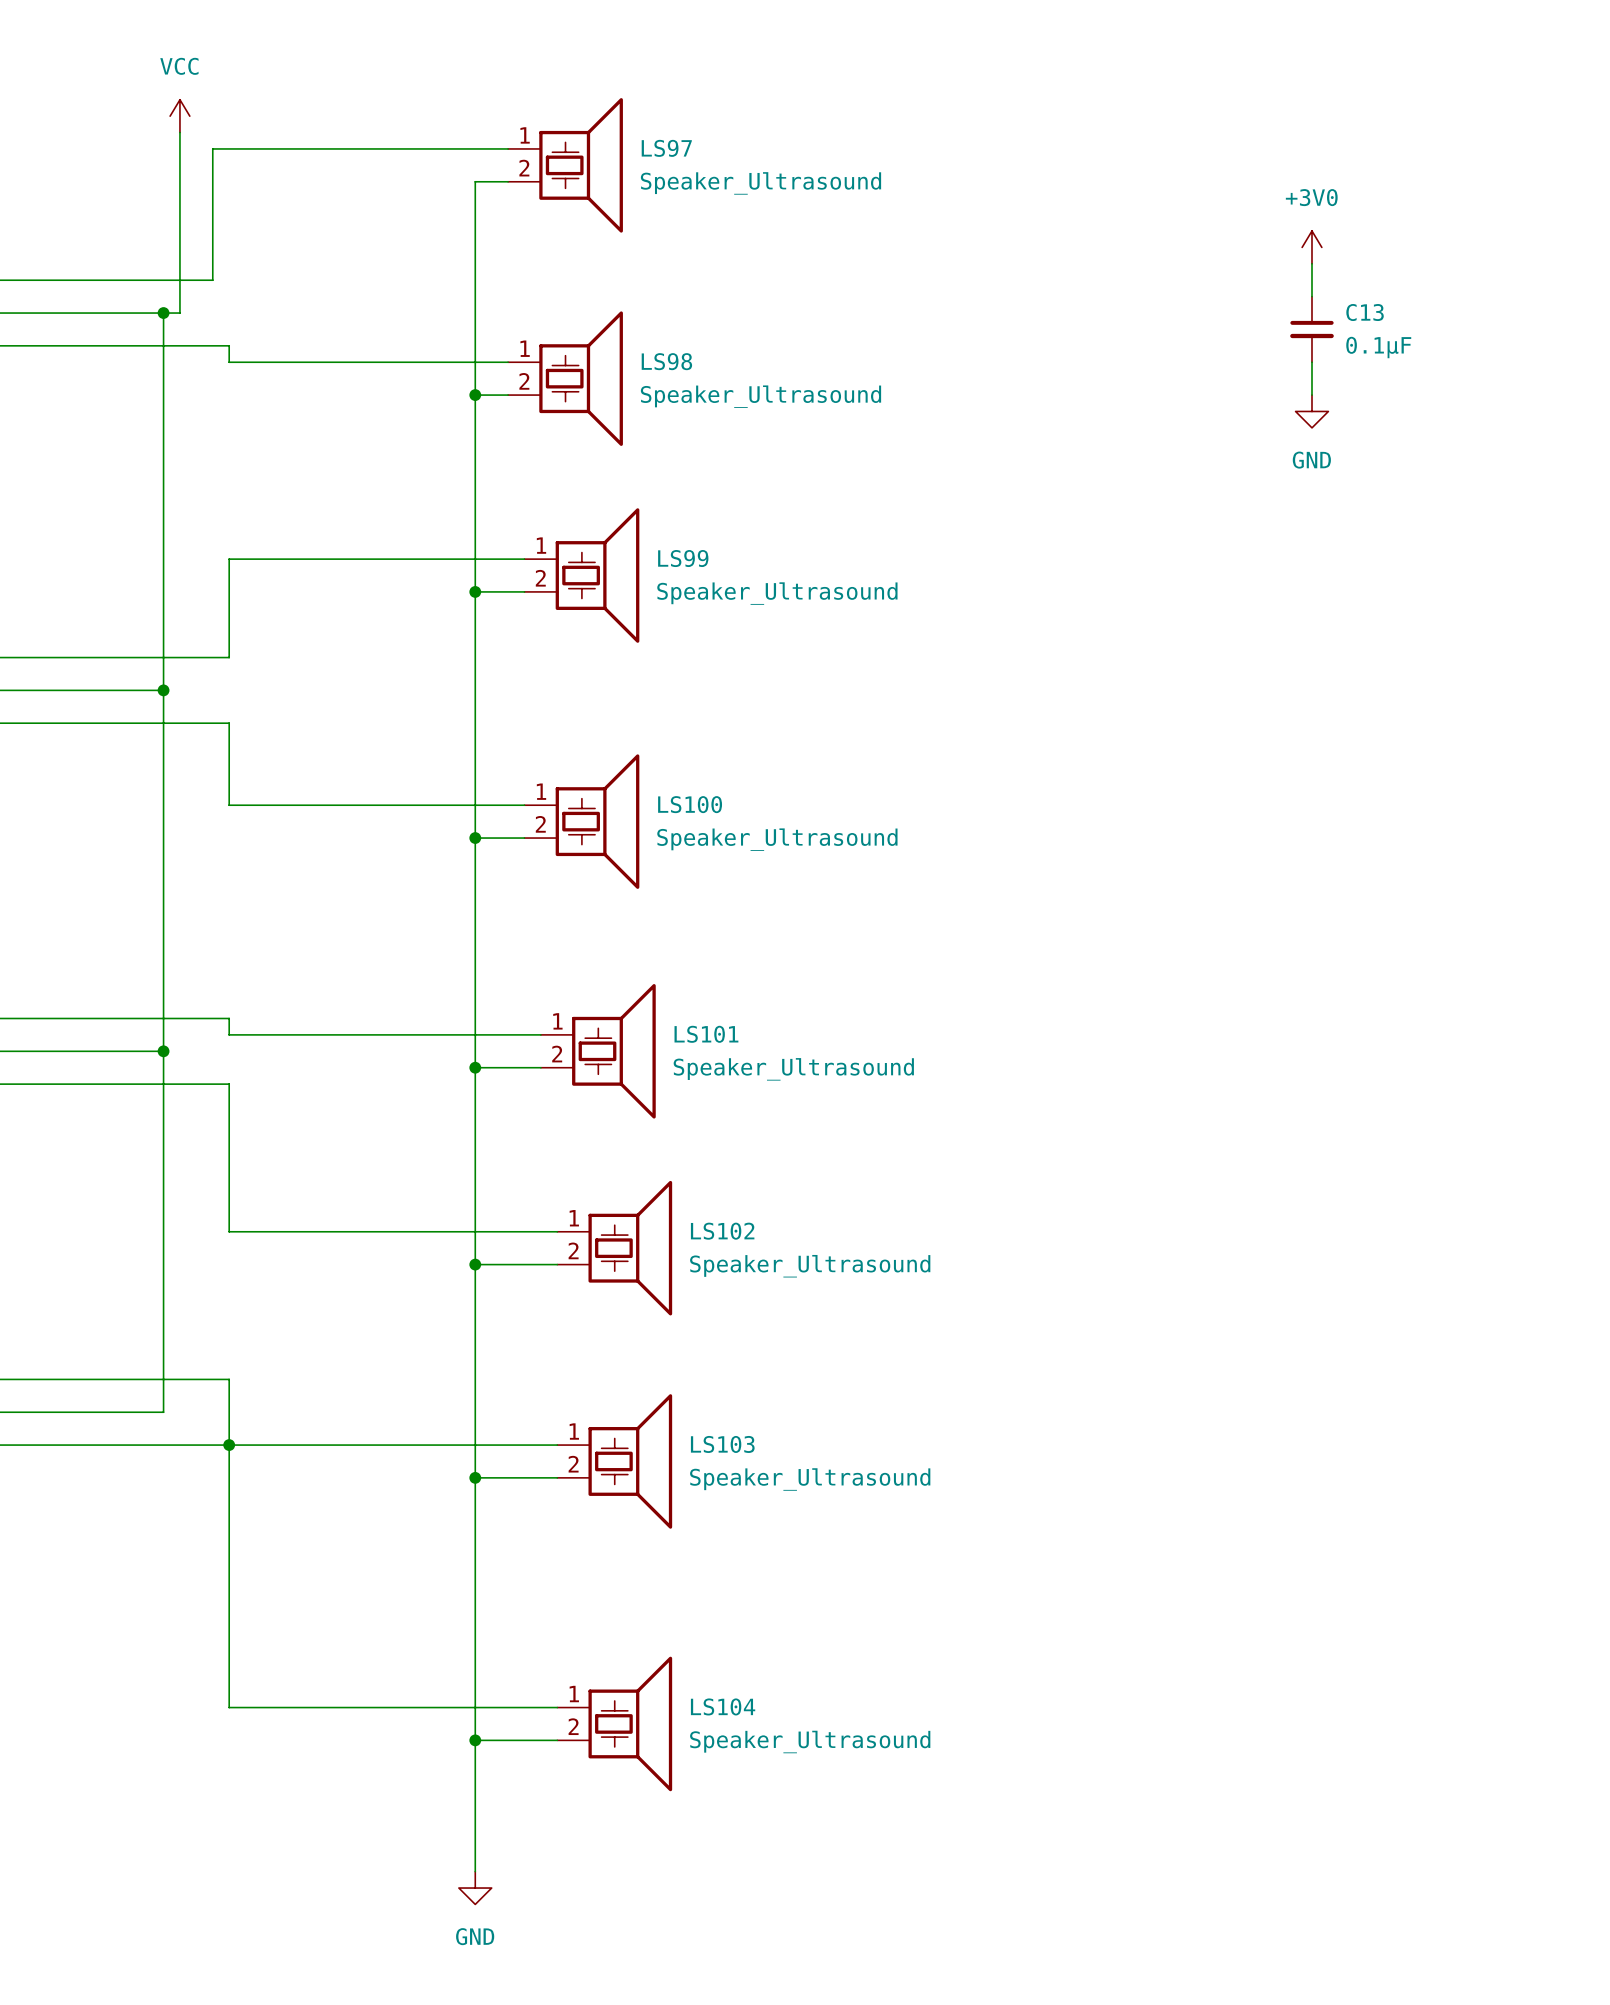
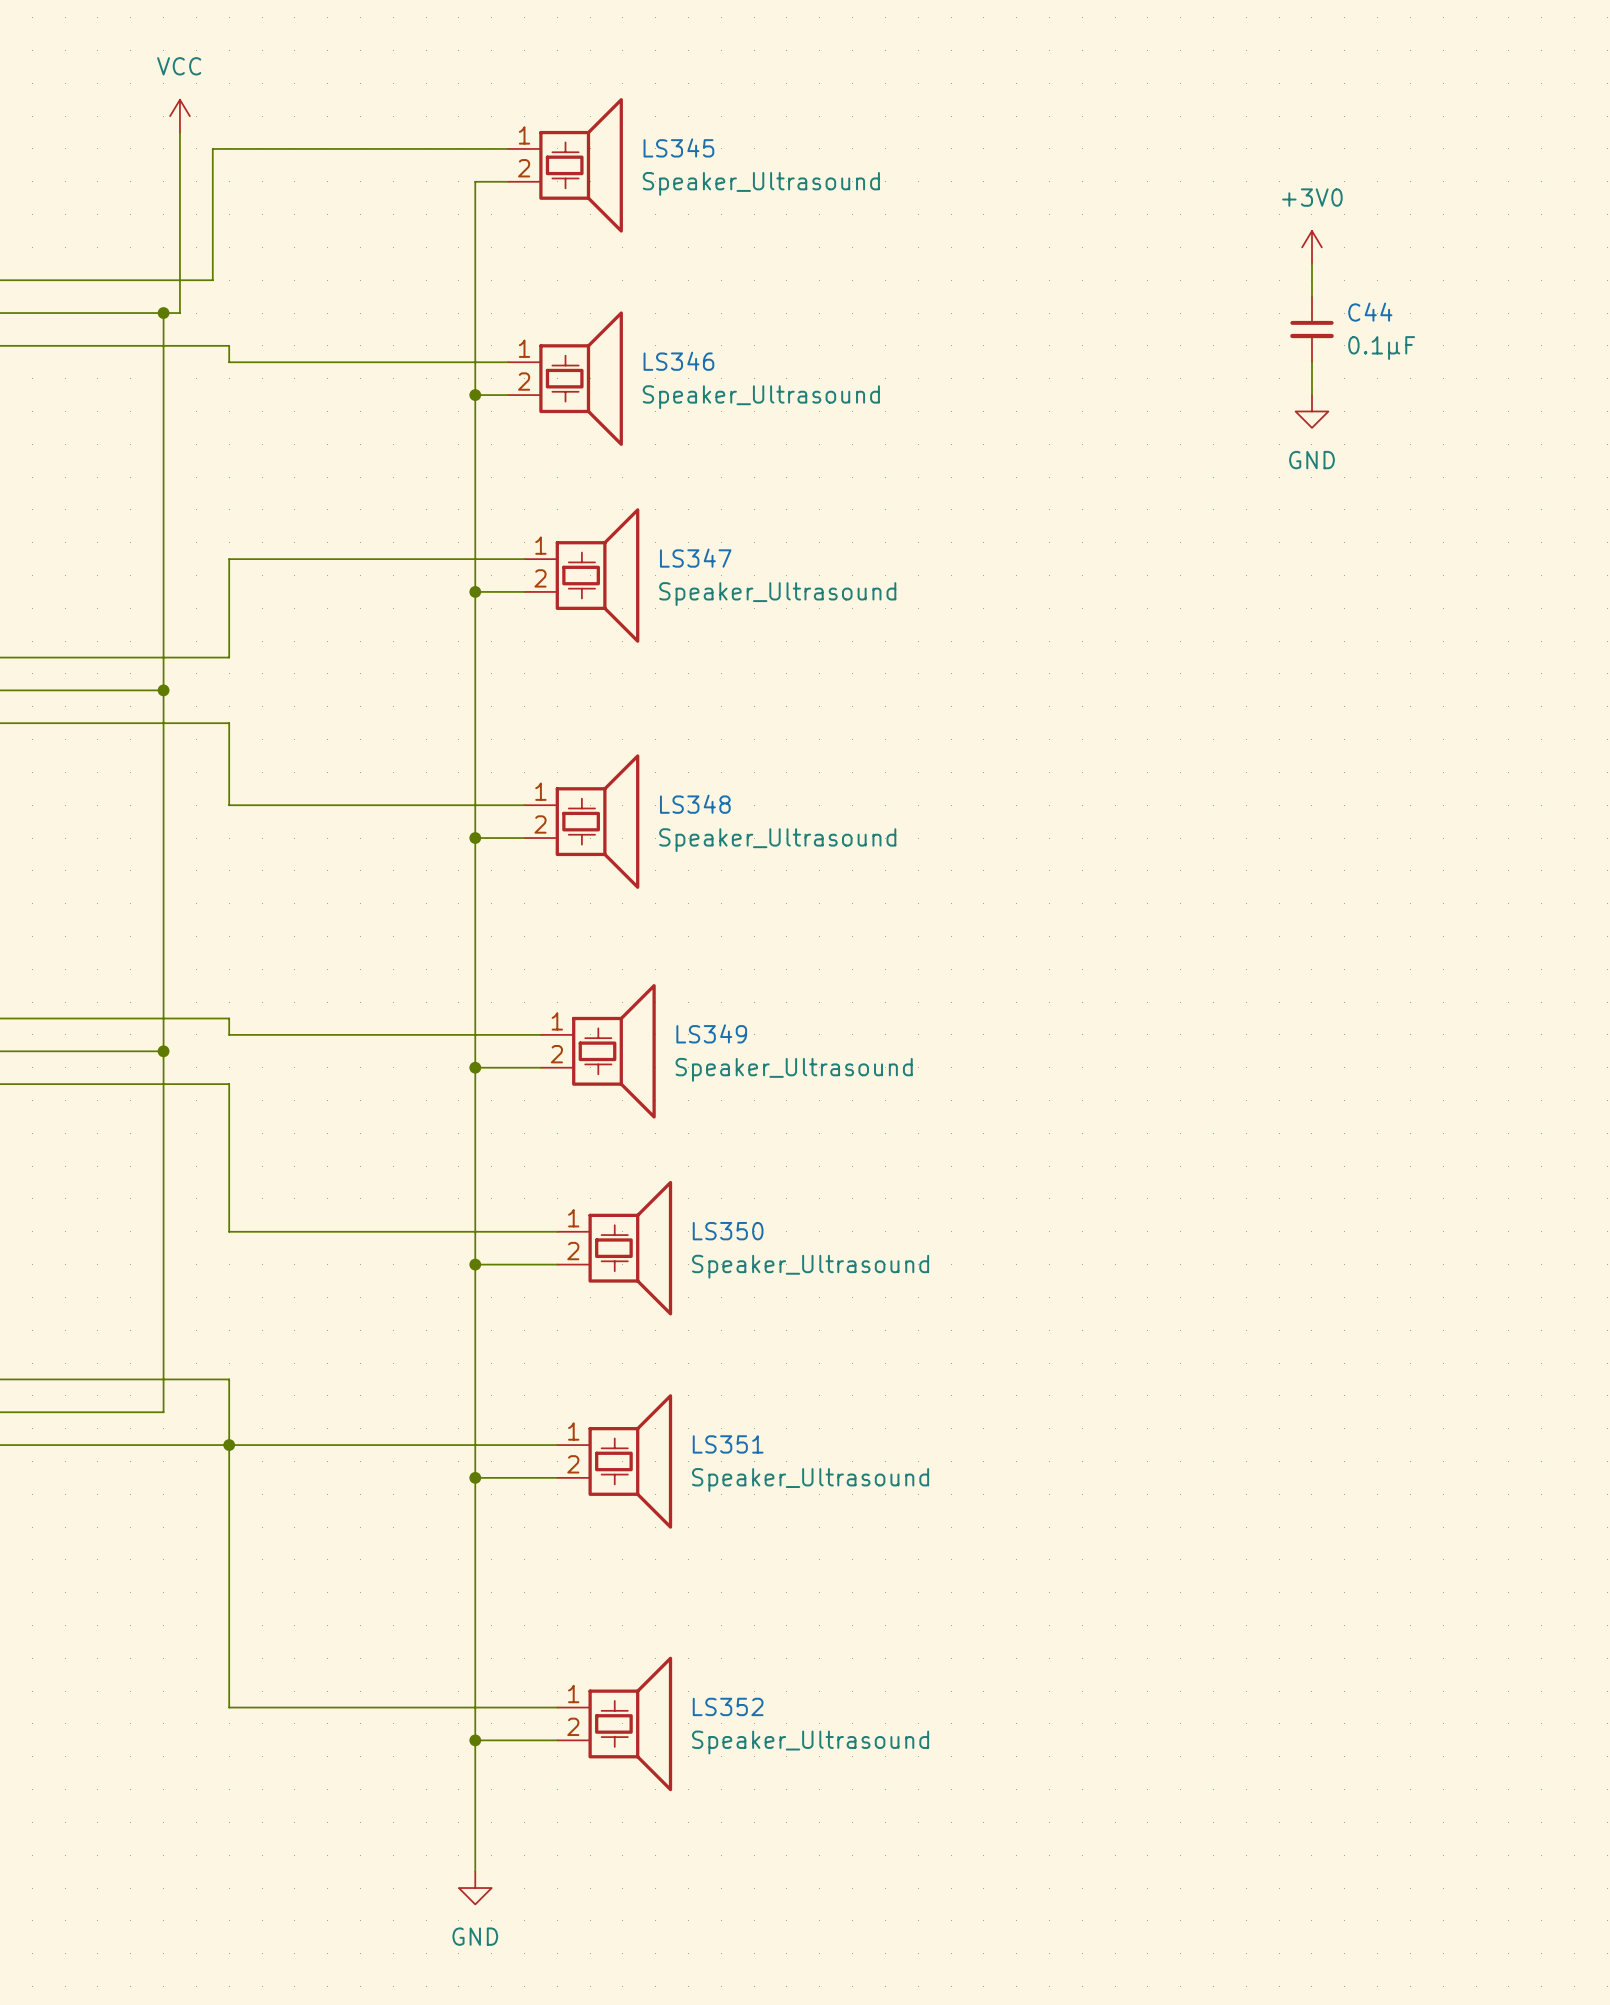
LS97 name: LS97 (666, 148) -> LS345 (678, 147)
C13 name: C13 (1365, 312) -> C44 (1370, 312)
LS98 name: LS98 (666, 361) -> LS346 (678, 361)
LS99 name: LS99 (683, 558) -> LS347 (695, 558)
LS100 name: LS100 (690, 804) -> LS348 (695, 804)
LS101 name: LS101 (706, 1034) -> LS349 (711, 1033)
LS102 name: LS102 (722, 1231) -> LS350 (728, 1231)
LS103 name: LS103 (722, 1444) -> LS351 (728, 1444)
LS104 name: LS104 (723, 1706) -> LS352 (728, 1706)

